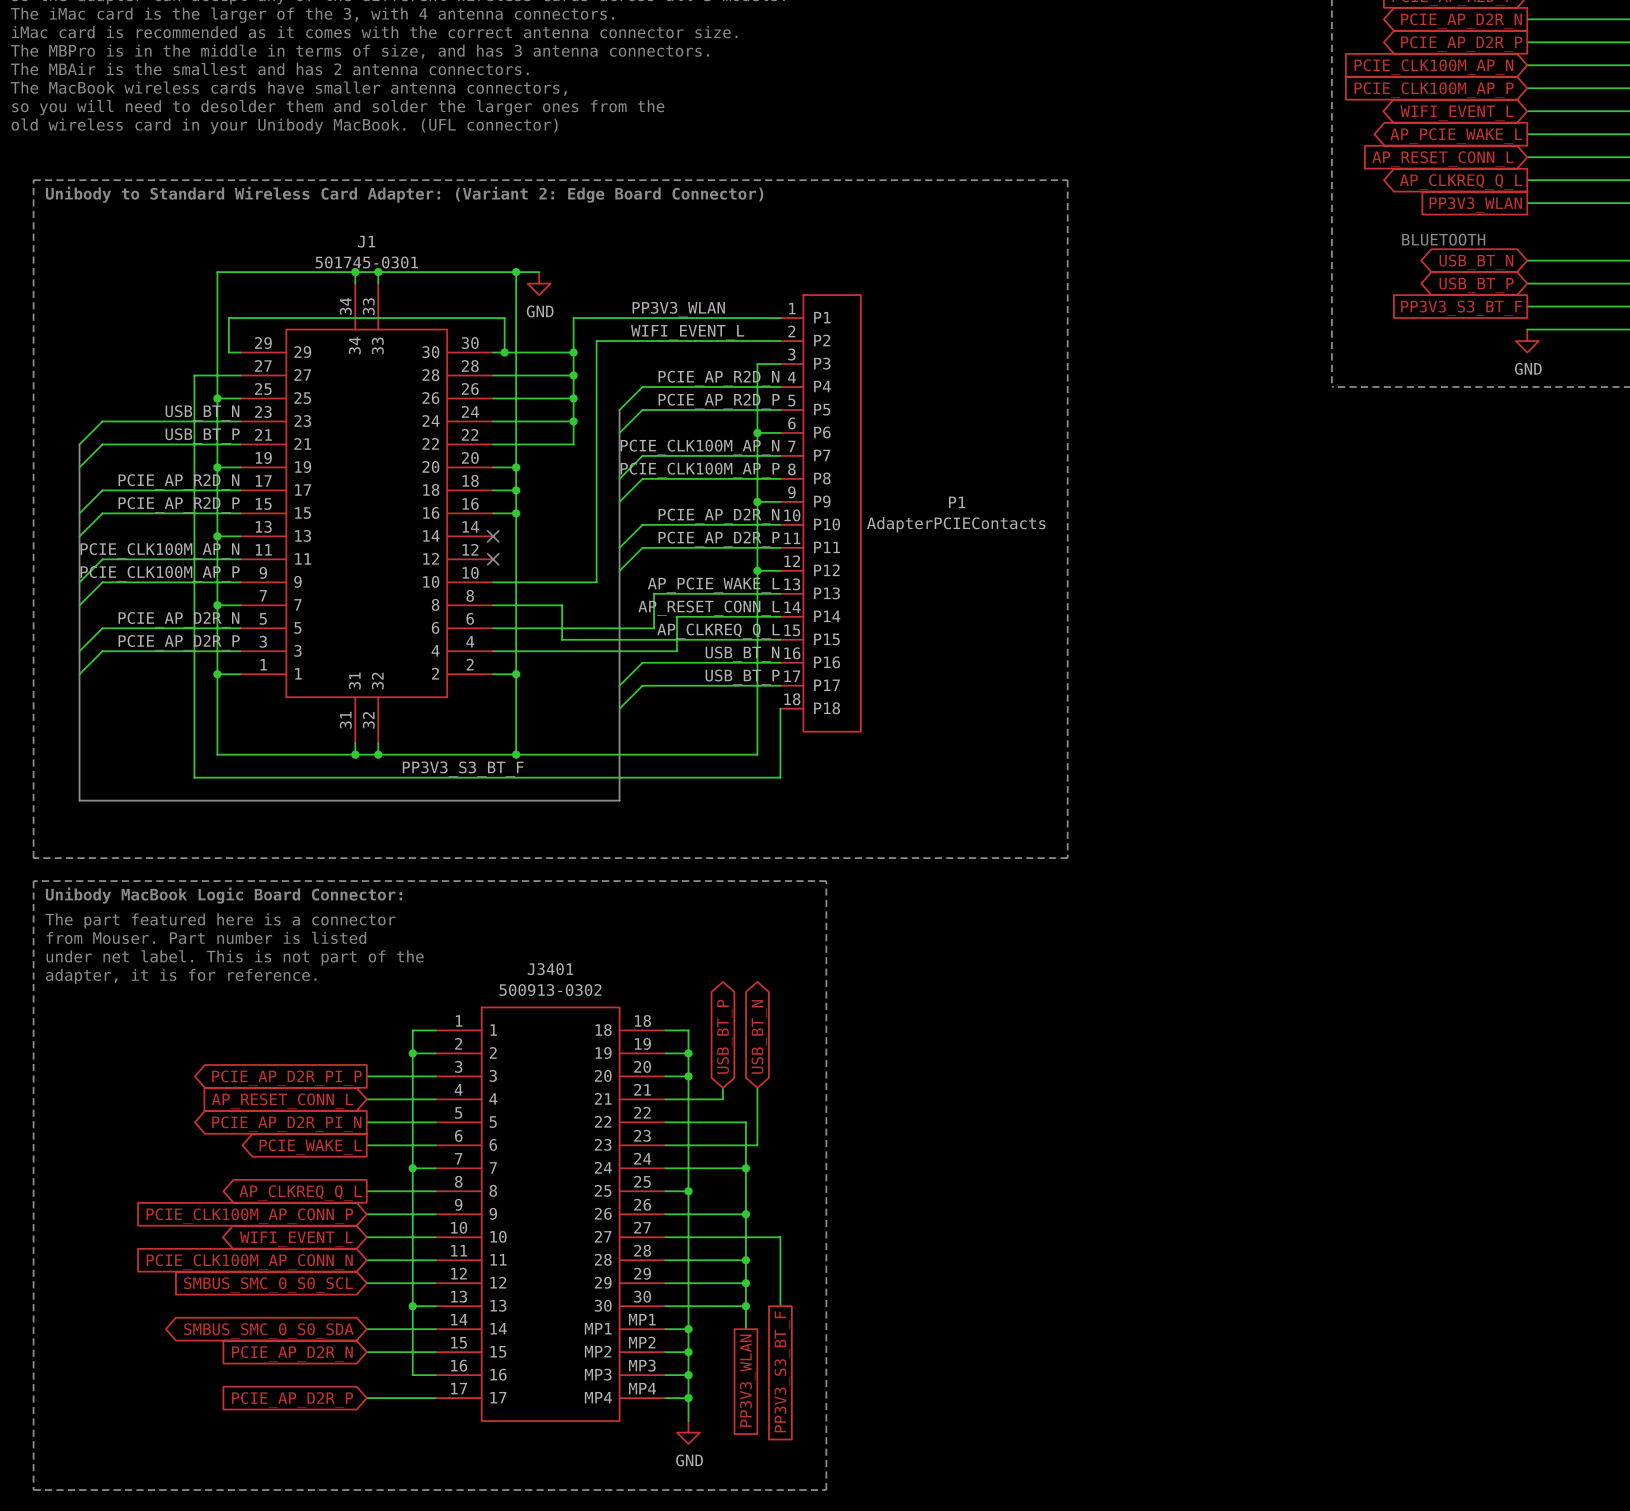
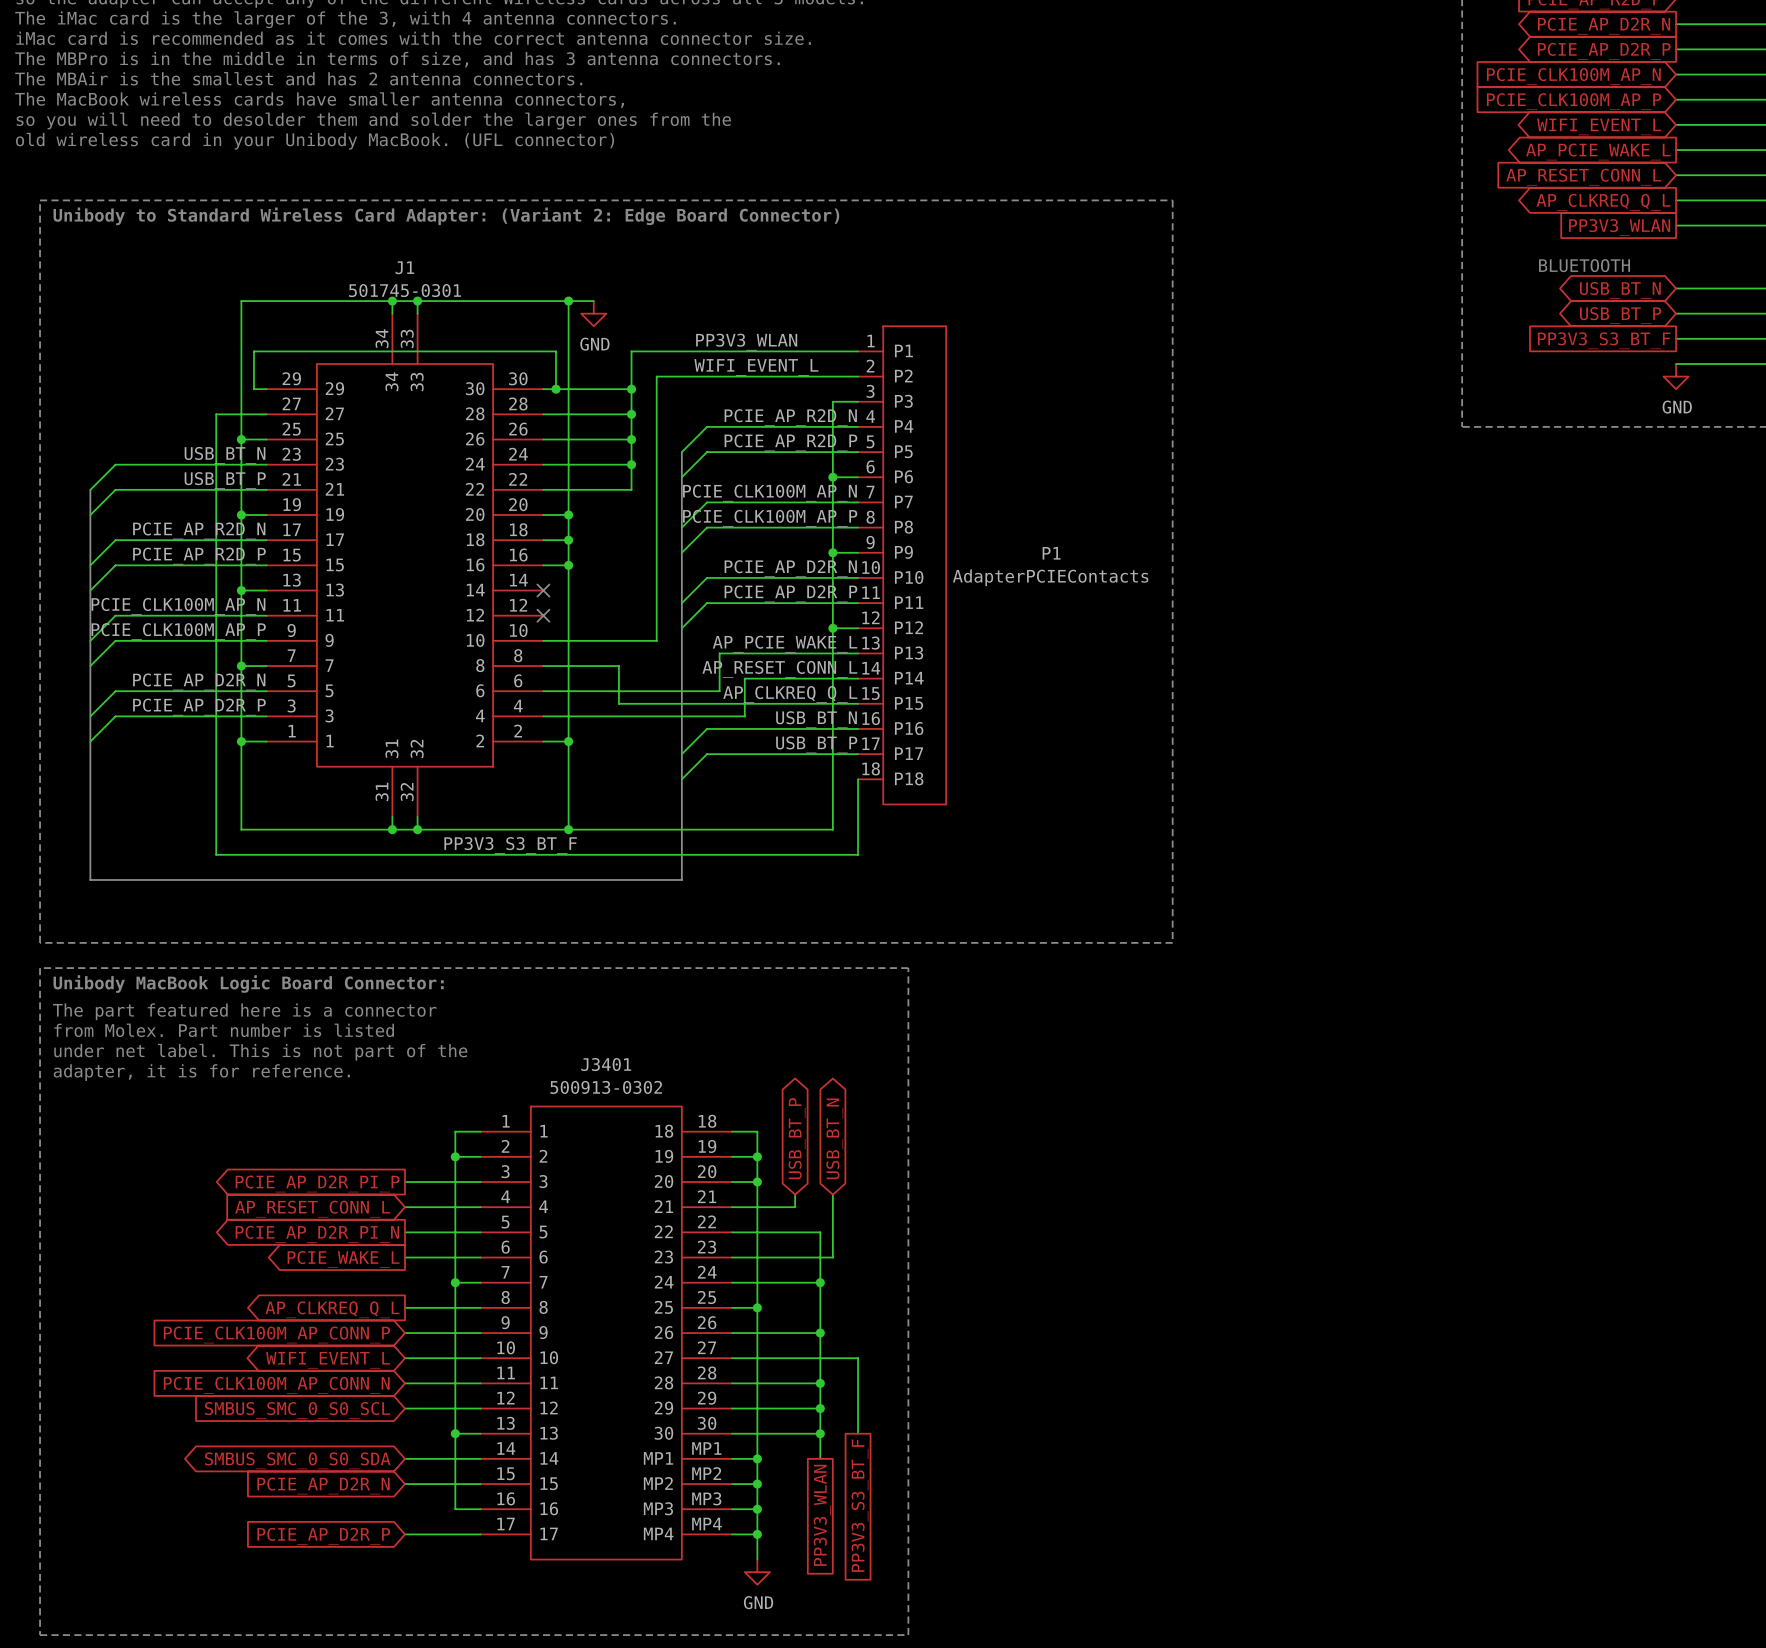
text: from Mouser. Part number is listed (206, 937) -> from Molex. Part number is listed (224, 1030)

